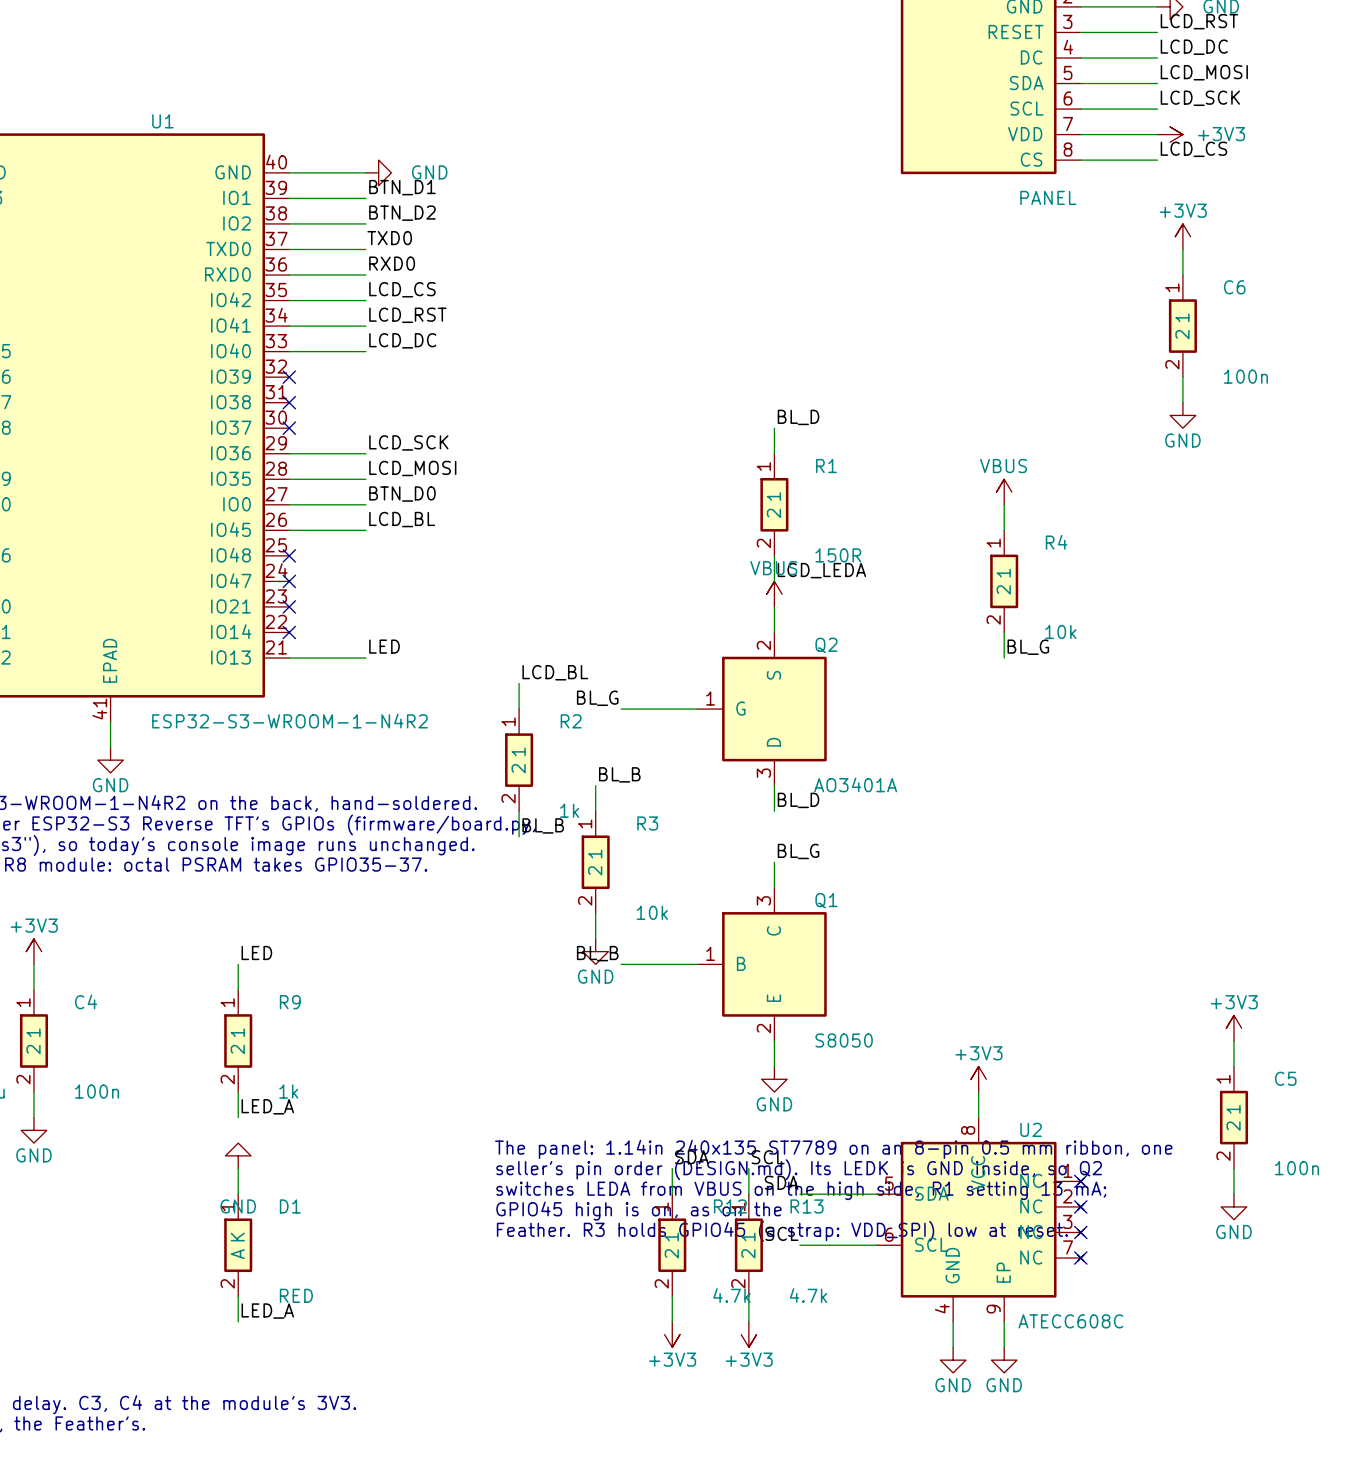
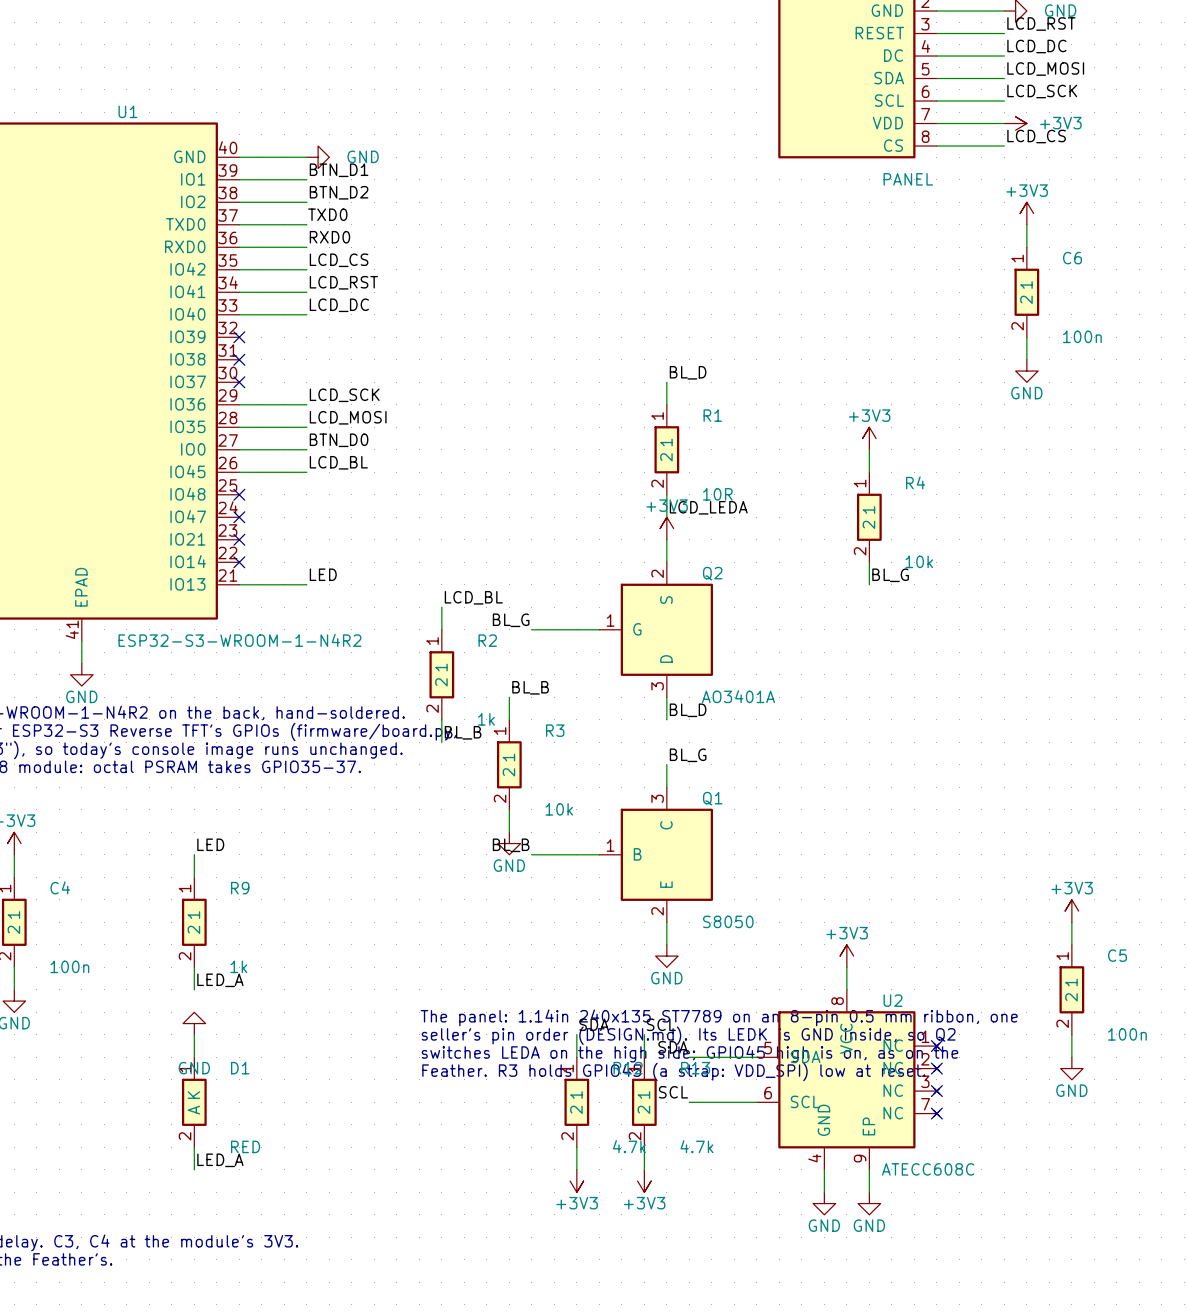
power symbol: VBUS (1004, 492) -> +3V3 (869, 438)
R1 value: 150R (838, 555) -> 10R (717, 494)
power symbol: VBUS (774, 594) -> +3V3 (666, 528)
text: switches LEDA from VBUS on the high side, R1 setting 13 mA; (801, 1190) -> switches LEDA on the high side; GPIO45 high is on, as on the (689, 1054)
text: GPIO45 high is on, as on the (638, 1211) -> Feather. R3 holds GPIO45 (a strap: VDD_SPI) low at reset. (673, 1071)
text: Feather. R3 holds GPIO45 (a strap: VDD_SPI) low at reset. (782, 1231) -> none

